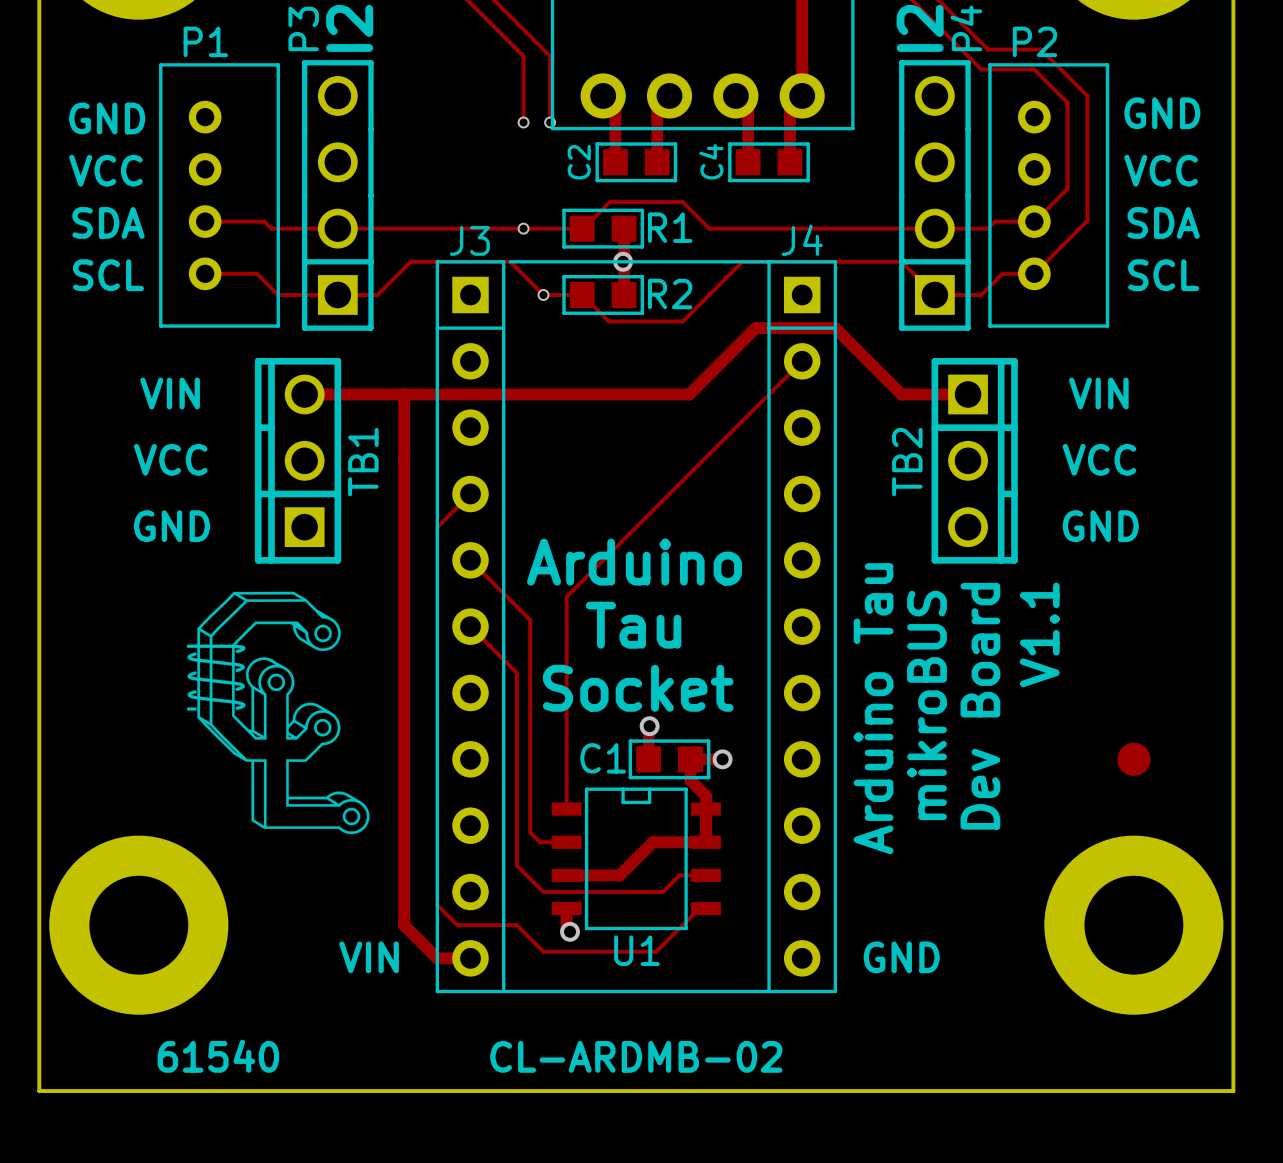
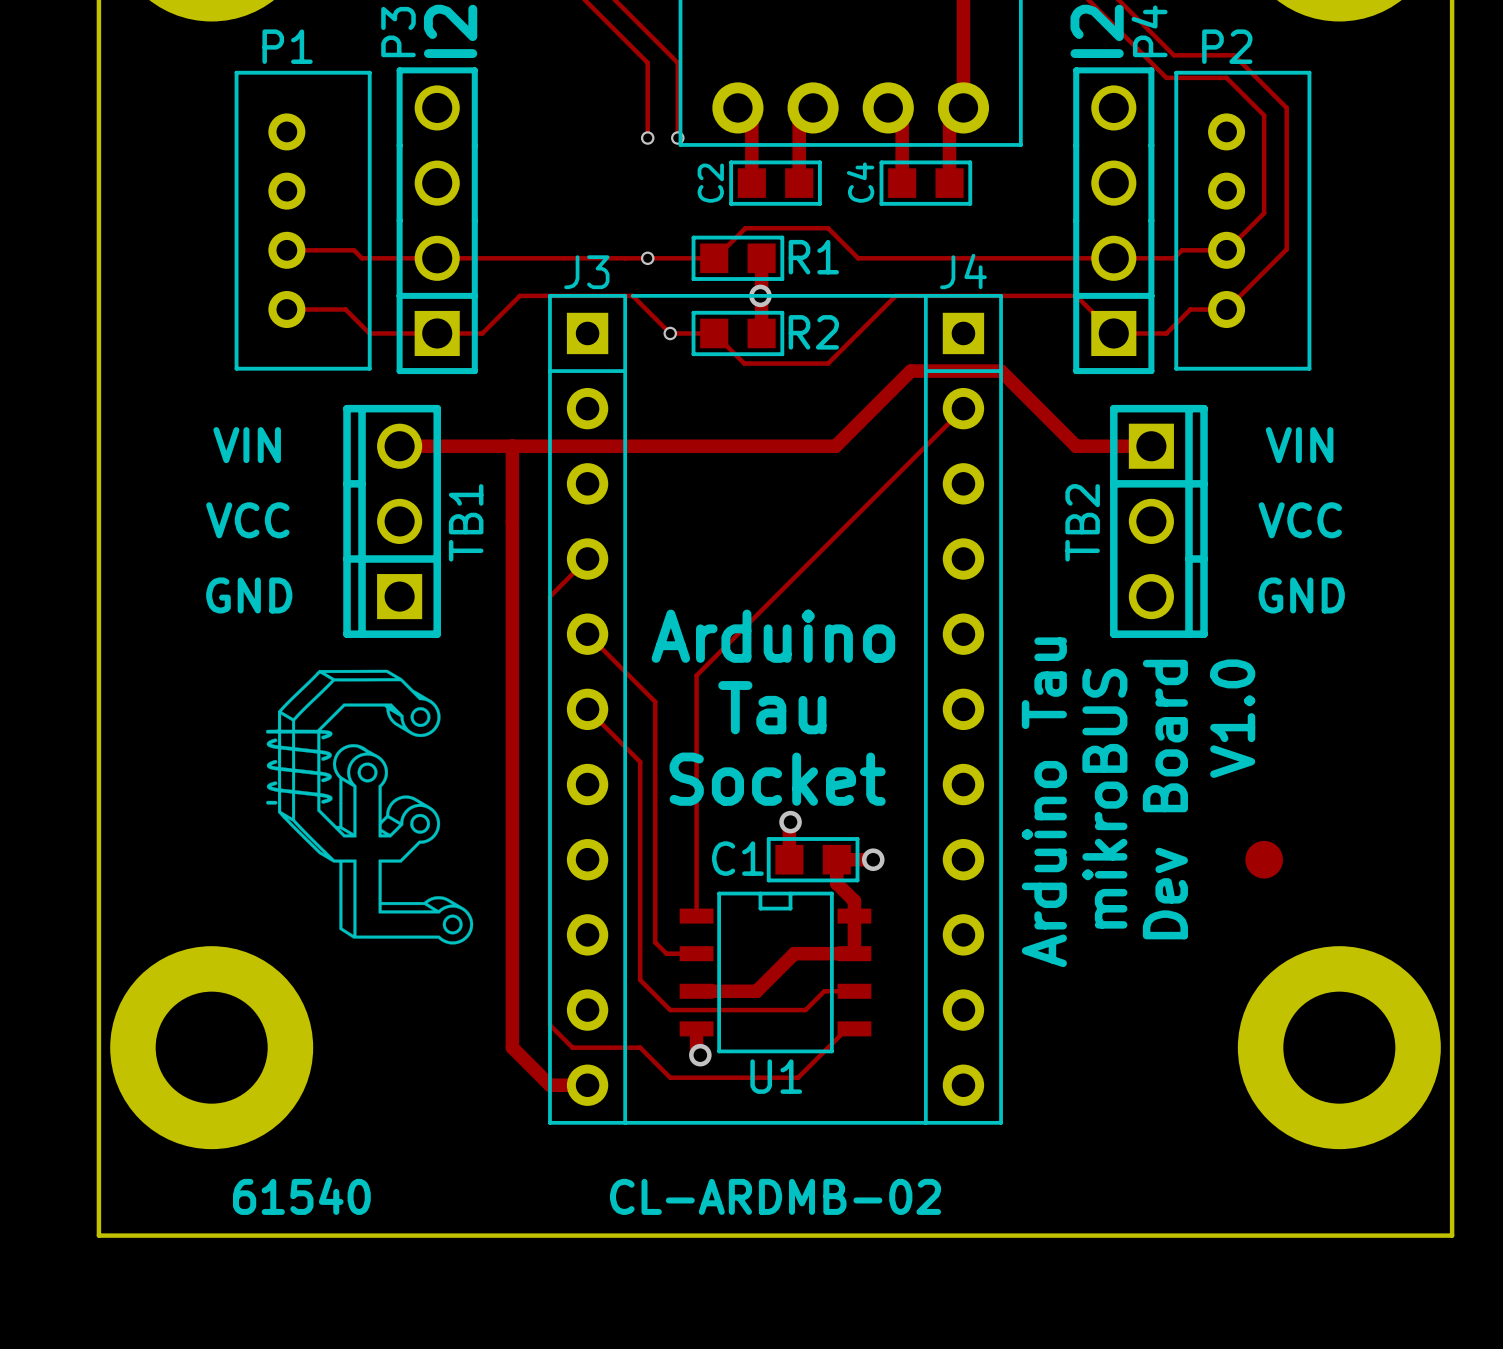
text: GND (1162, 113) -> none
text: GND (107, 118) -> none
text: VCC (105, 170) -> none
text: VCC (1161, 170) -> none
text: SDA (108, 222) -> none
text: SDA (1163, 222) -> none
text: SCL (108, 275) -> none
text: SCL (1163, 275) -> none
text: V1.1 (1039, 634) -> V1.0 (1232, 718)
part position: (1133, 759) -> (1264, 859)
text: VIN (369, 957) -> none
text: GND (901, 957) -> none

